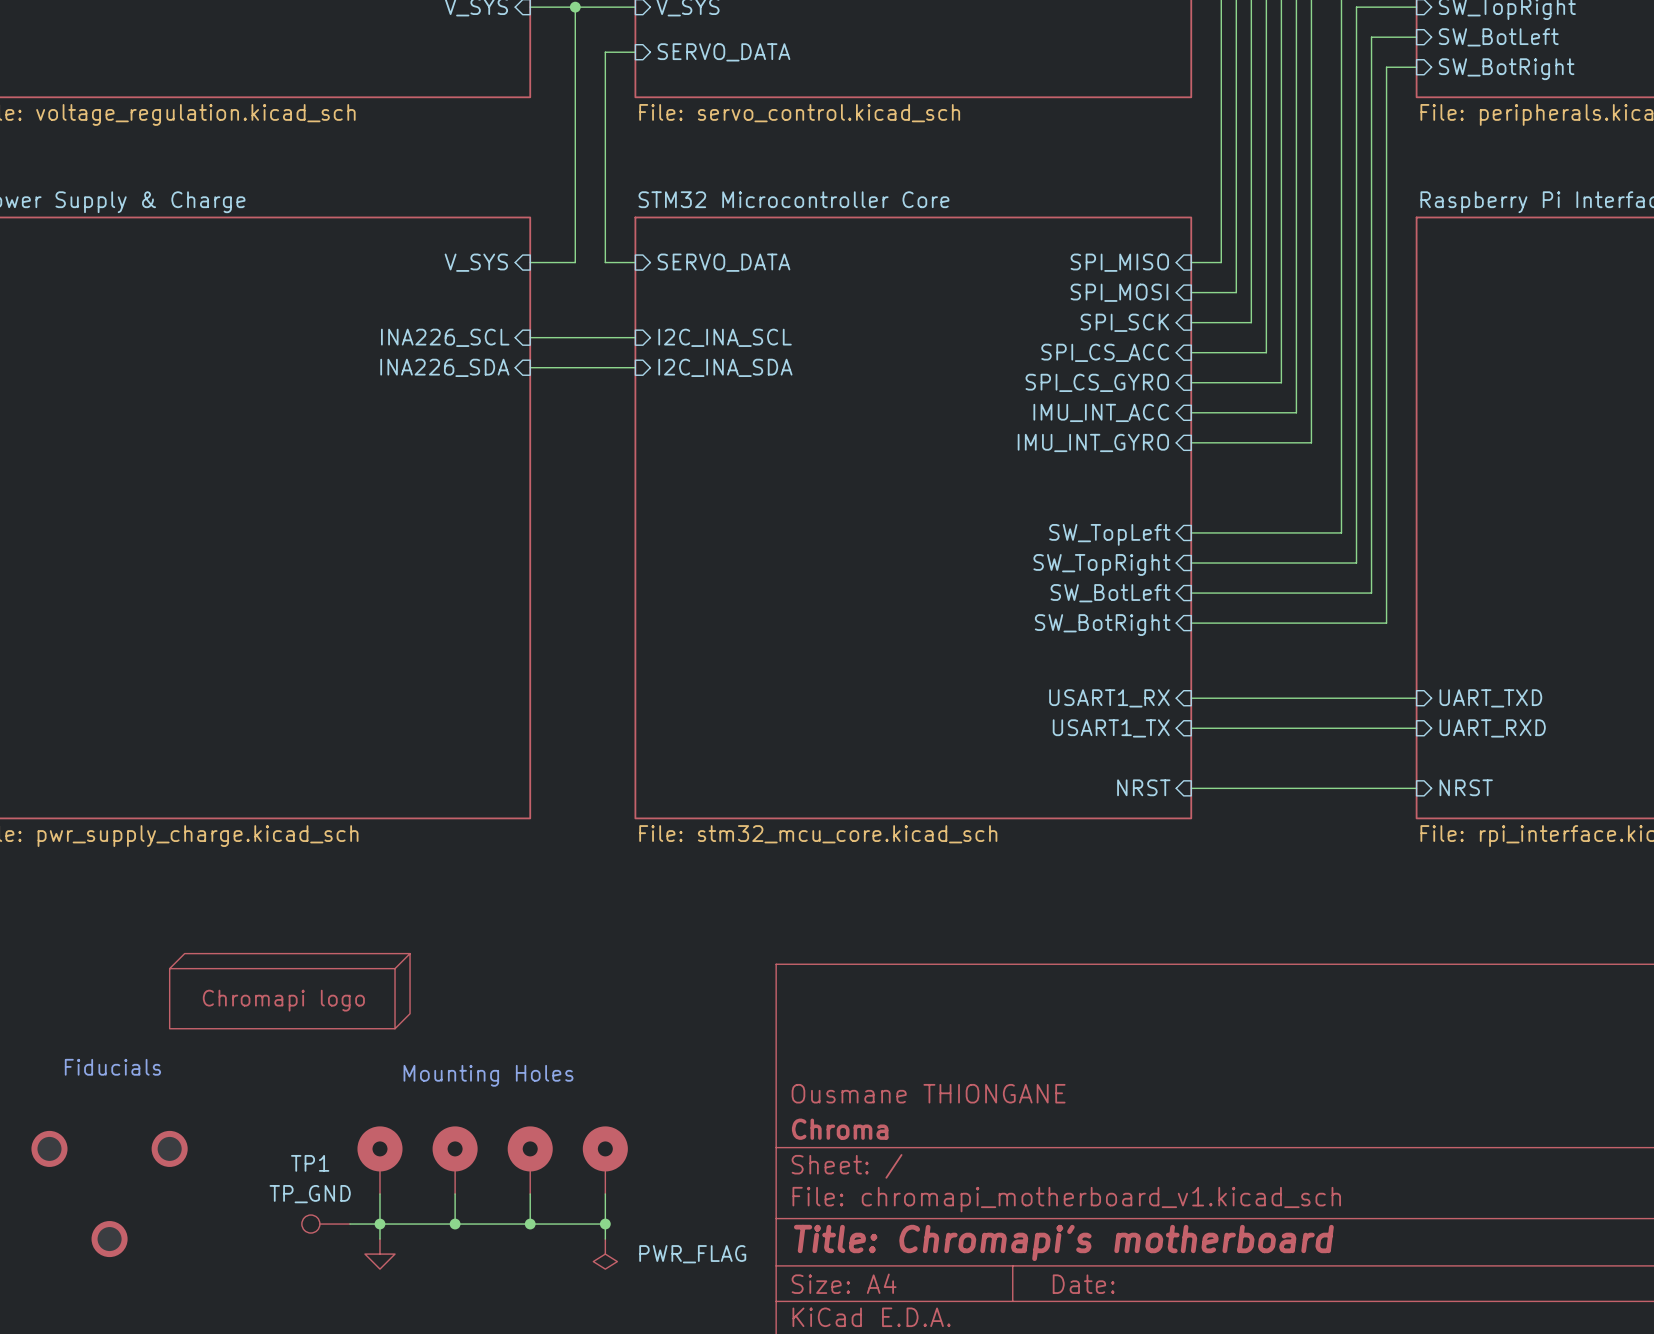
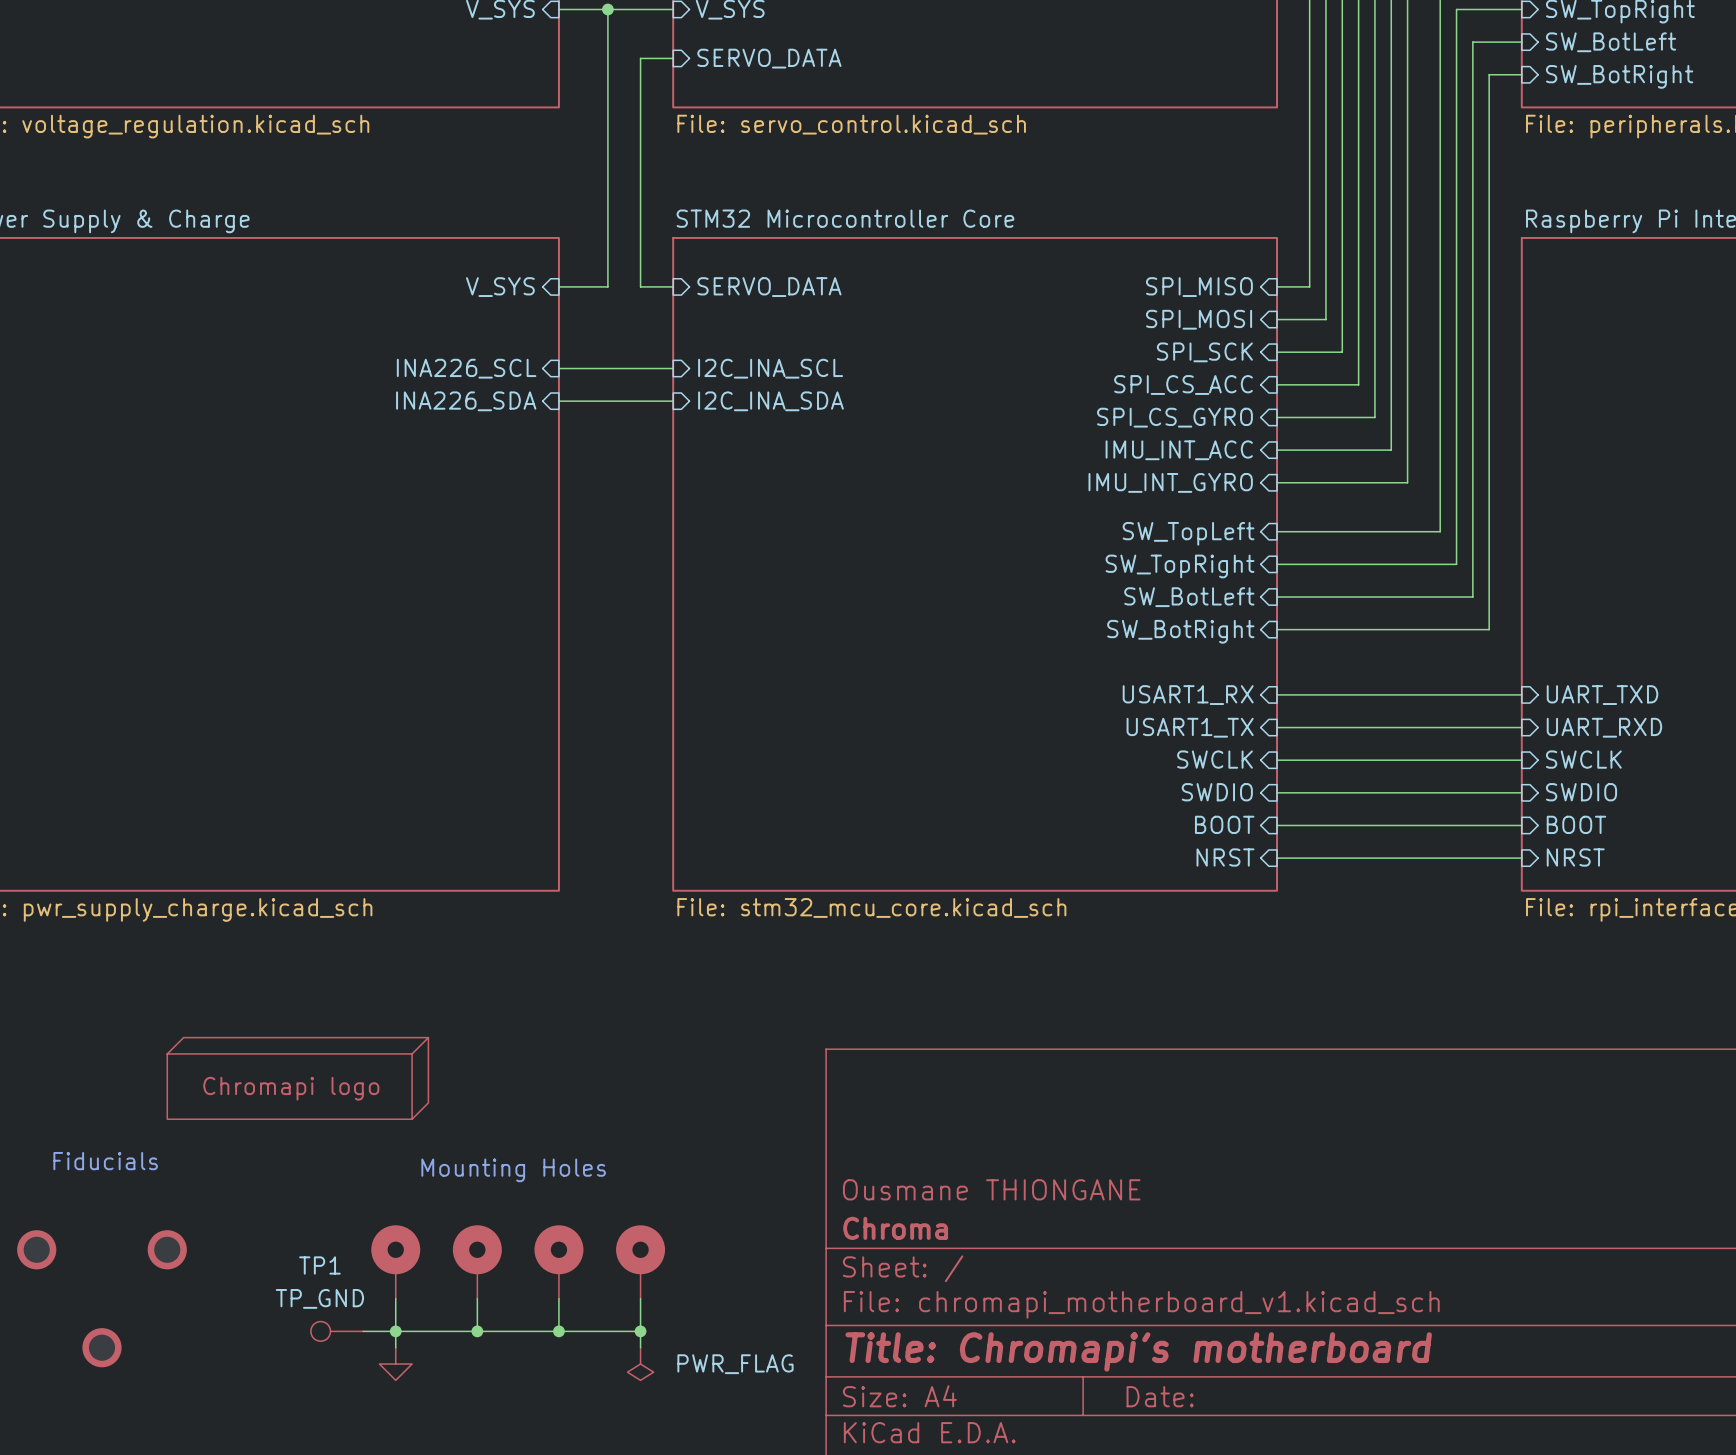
wire: (1341, 487) (1341, 532) (1191, 532) -> (1440, 531) (1277, 531)
wire: (1356, 517) (1356, 563) (1191, 563) -> (1456, 564) (1277, 564)
sheet pin position: SW_TopLeft (1109, 534) -> SW_TopLeft (1188, 533)
wire: (1371, 547) (1371, 593) (1191, 593) -> (1472, 596) (1277, 596)
sheet pin position: SW_TopRight (1101, 564) -> SW_TopRight (1180, 566)
wire: (1386, 578) (1386, 623) (1191, 623) -> (1489, 629) (1277, 629)
sheet pin position: SW_BotLeft (1110, 593) -> SW_BotLeft (1189, 597)
sheet pin position: SW_BotRight (1102, 625) -> SW_BotRight (1180, 631)
sheet pin: none -> USART1_RX (1188, 695)
wire: none -> (1277, 694) (1521, 694)
sheet pin: none -> UART_TXD (1602, 695)
sheet pin: none -> USART1_TX (1190, 727)
wire: none -> (1277, 727) (1521, 727)
sheet pin: none -> UART_RXD (1604, 727)
sheet pin: USART1_RX (1109, 698) -> SWCLK (1214, 759)
sheet pin: UART_TXD (1490, 698) -> SWCLK (1583, 759)
sheet pin: USART1_TX (1111, 728) -> SWDIO (1217, 792)
sheet pin: UART_RXD (1492, 728) -> SWDIO (1581, 792)
sheet pin: none -> BOOT (1224, 824)
sheet pin: none -> BOOT (1576, 824)
wire: none -> (1277, 825) (1521, 825)

